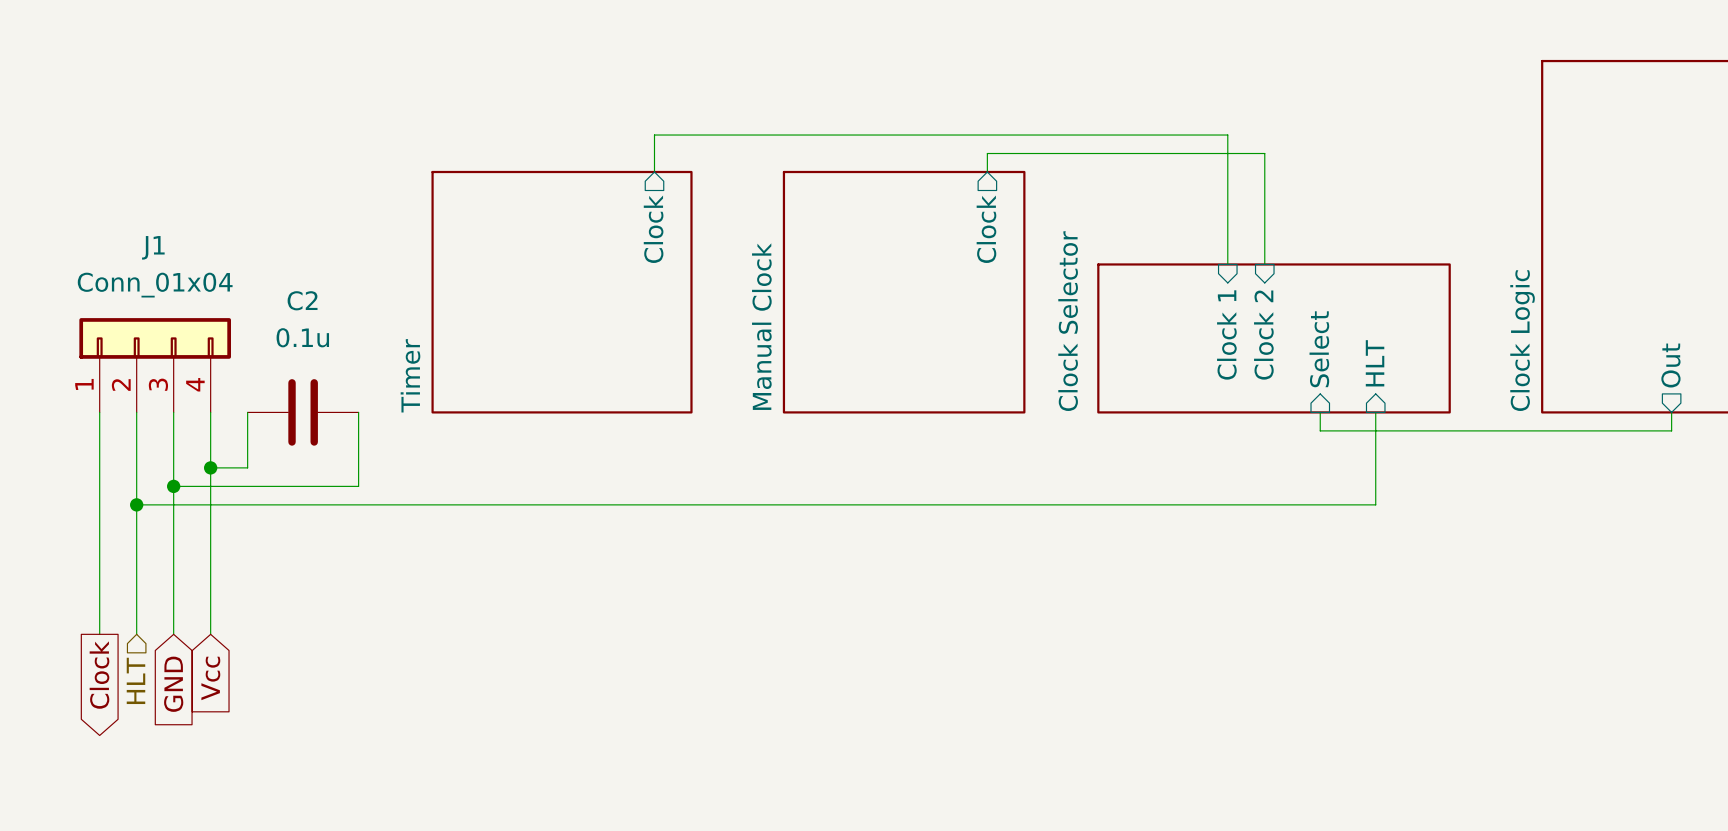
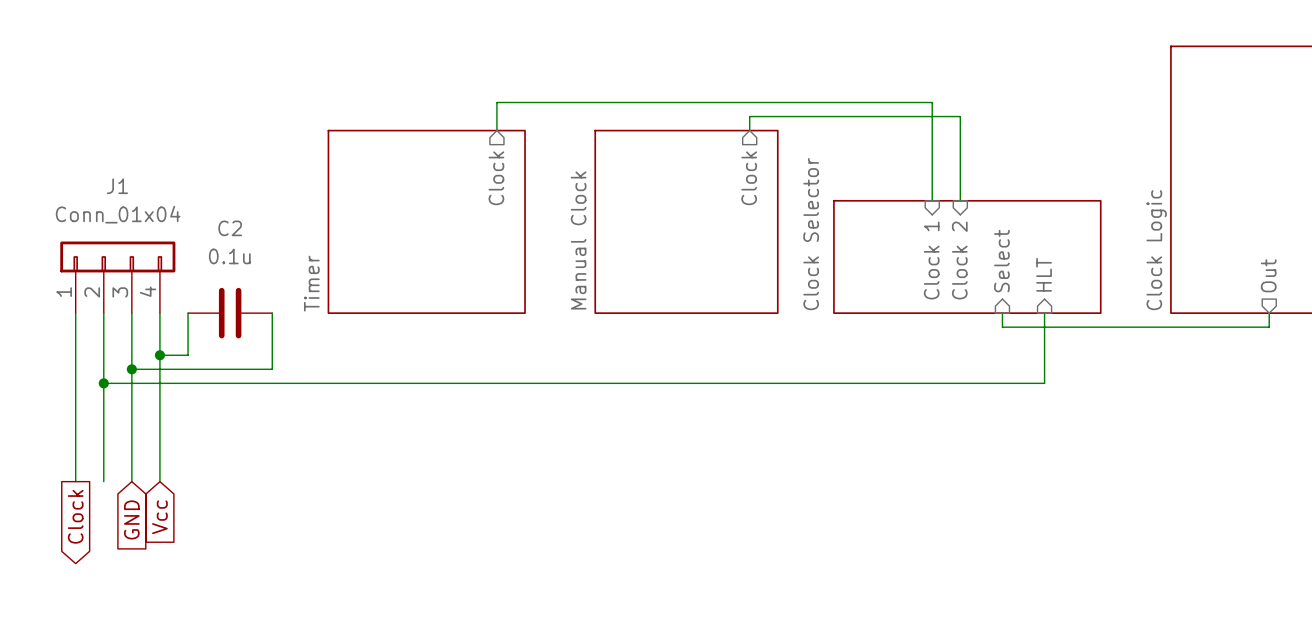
hierarchical label: HLT (135, 680) -> none

